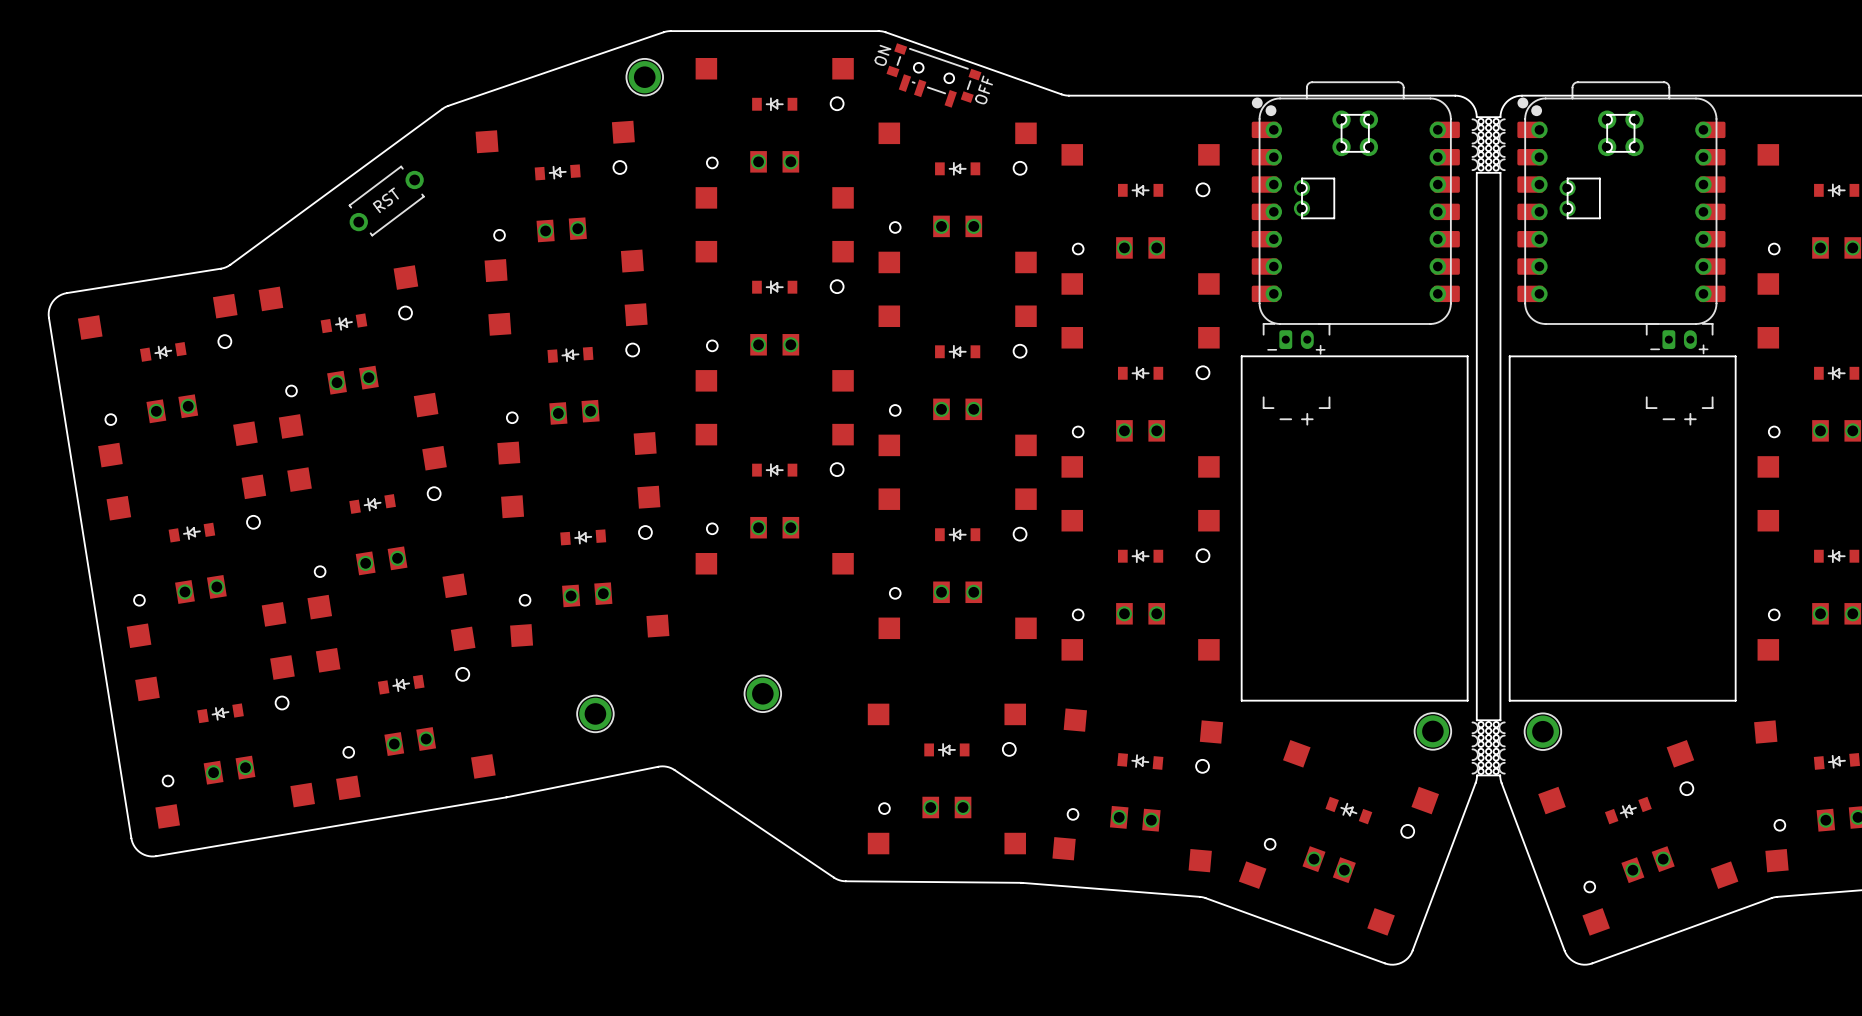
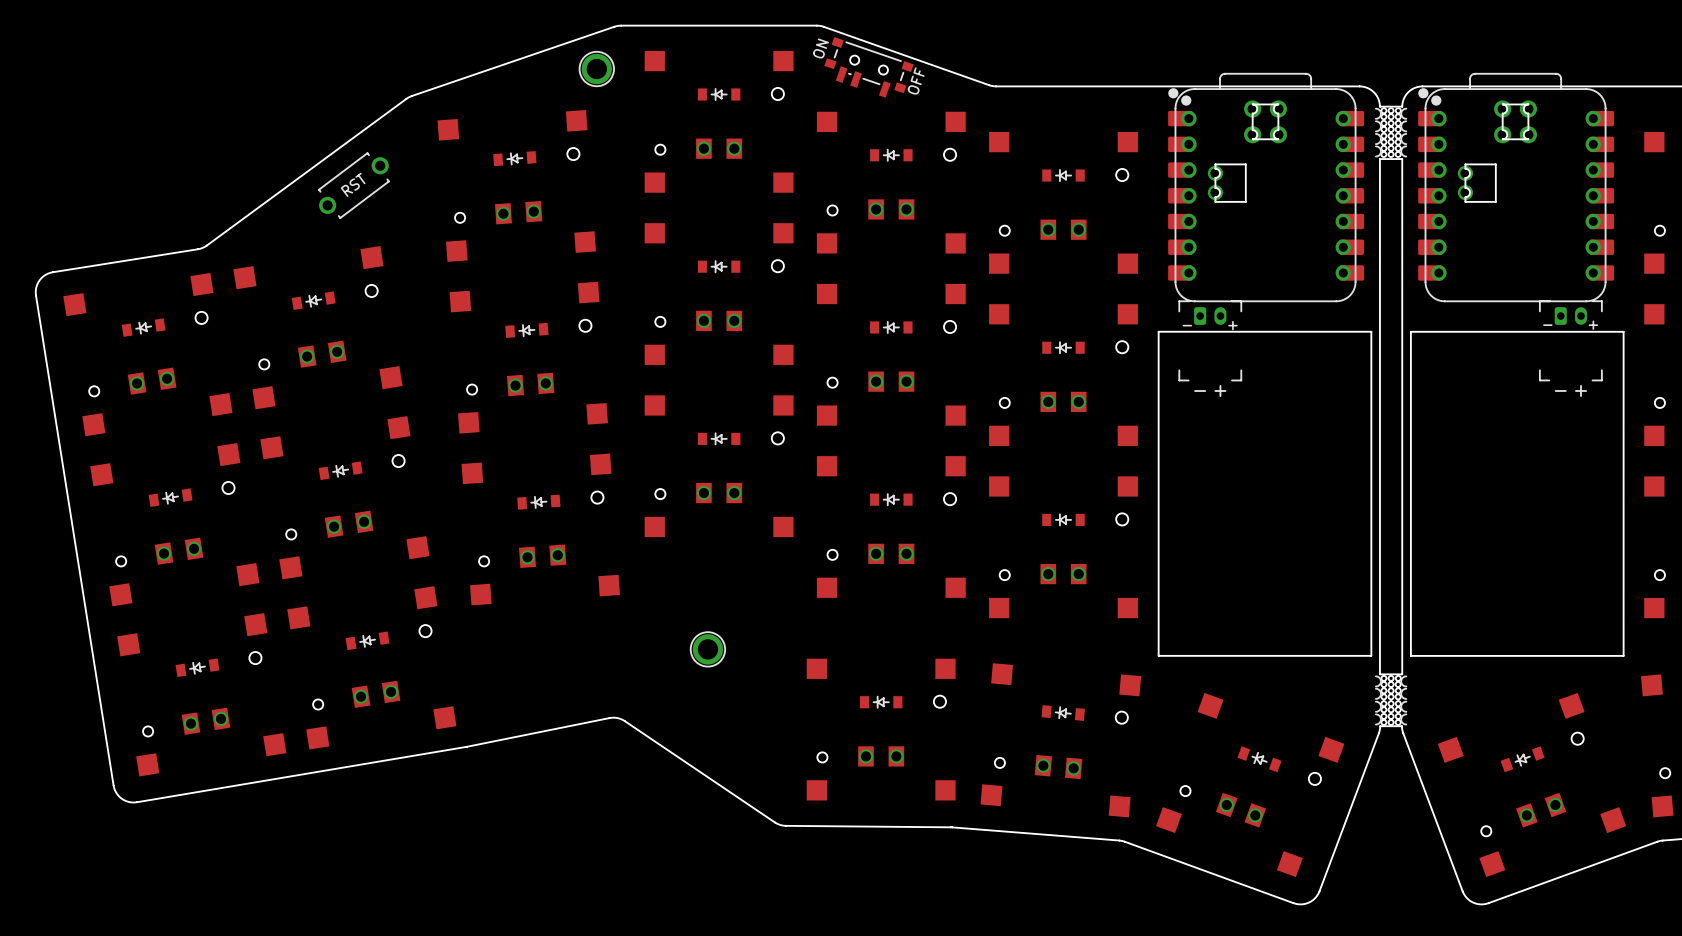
part: (595, 713) -> none
part: (1432, 731) -> none
part: (1542, 731) -> none

